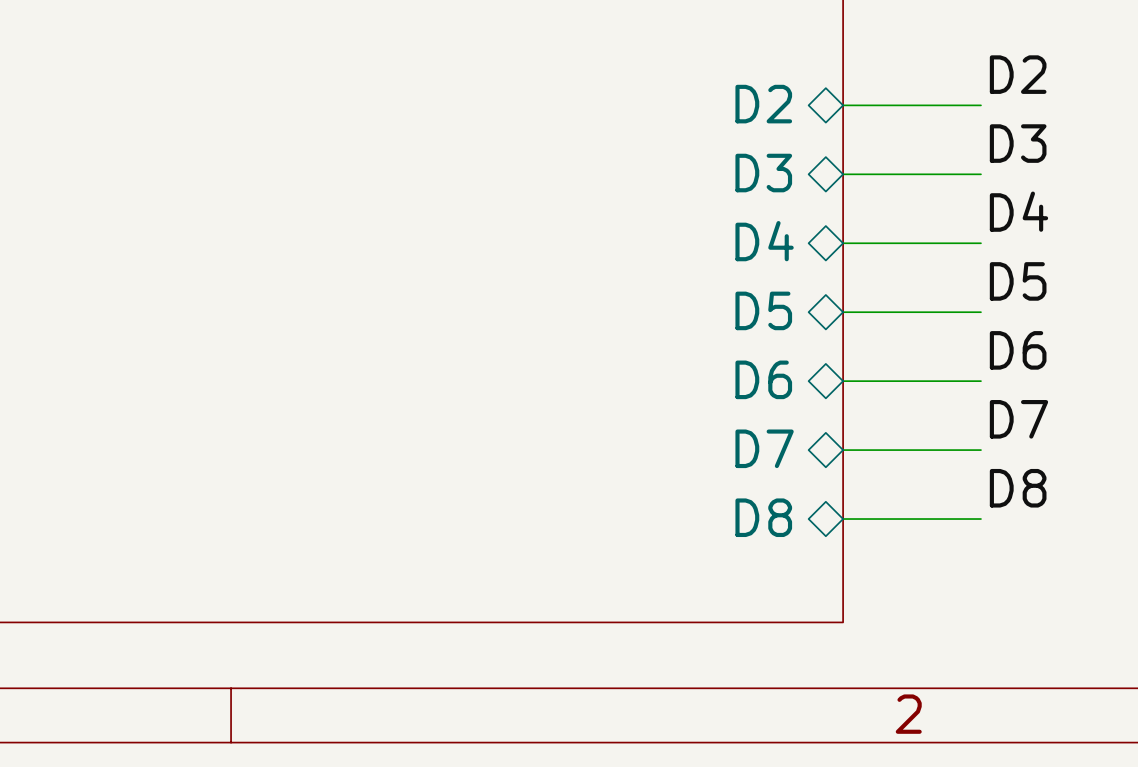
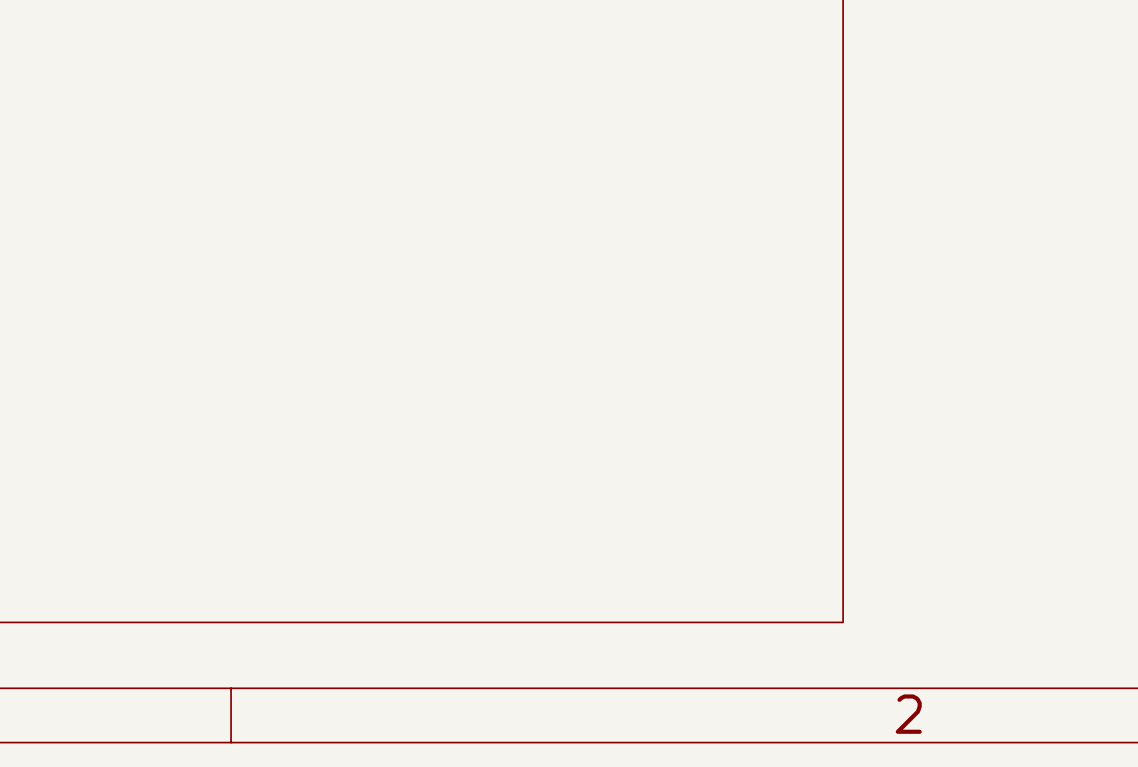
label: D2 (1018, 74) -> none
sheet pin: D2 (763, 104) -> none
wire: (843, 105) (980, 105) -> none
label: D3 (1018, 143) -> none
sheet pin: D3 (763, 173) -> none
wire: (843, 174) (980, 174) -> none
label: D4 (1018, 211) -> none
sheet pin: D4 (764, 241) -> none
wire: (843, 243) (980, 243) -> none
label: D5 (1018, 281) -> none
sheet pin: D5 (763, 310) -> none
wire: (843, 312) (980, 312) -> none
label: D6 (1018, 350) -> none
sheet pin: D6 (763, 379) -> none
wire: (843, 381) (980, 381) -> none
label: D7 (1018, 419) -> none
sheet pin: D7 (764, 448) -> none
wire: (843, 450) (980, 450) -> none
label: D8 (1018, 488) -> none
sheet pin: D8 (763, 517) -> none
wire: (843, 519) (980, 519) -> none

